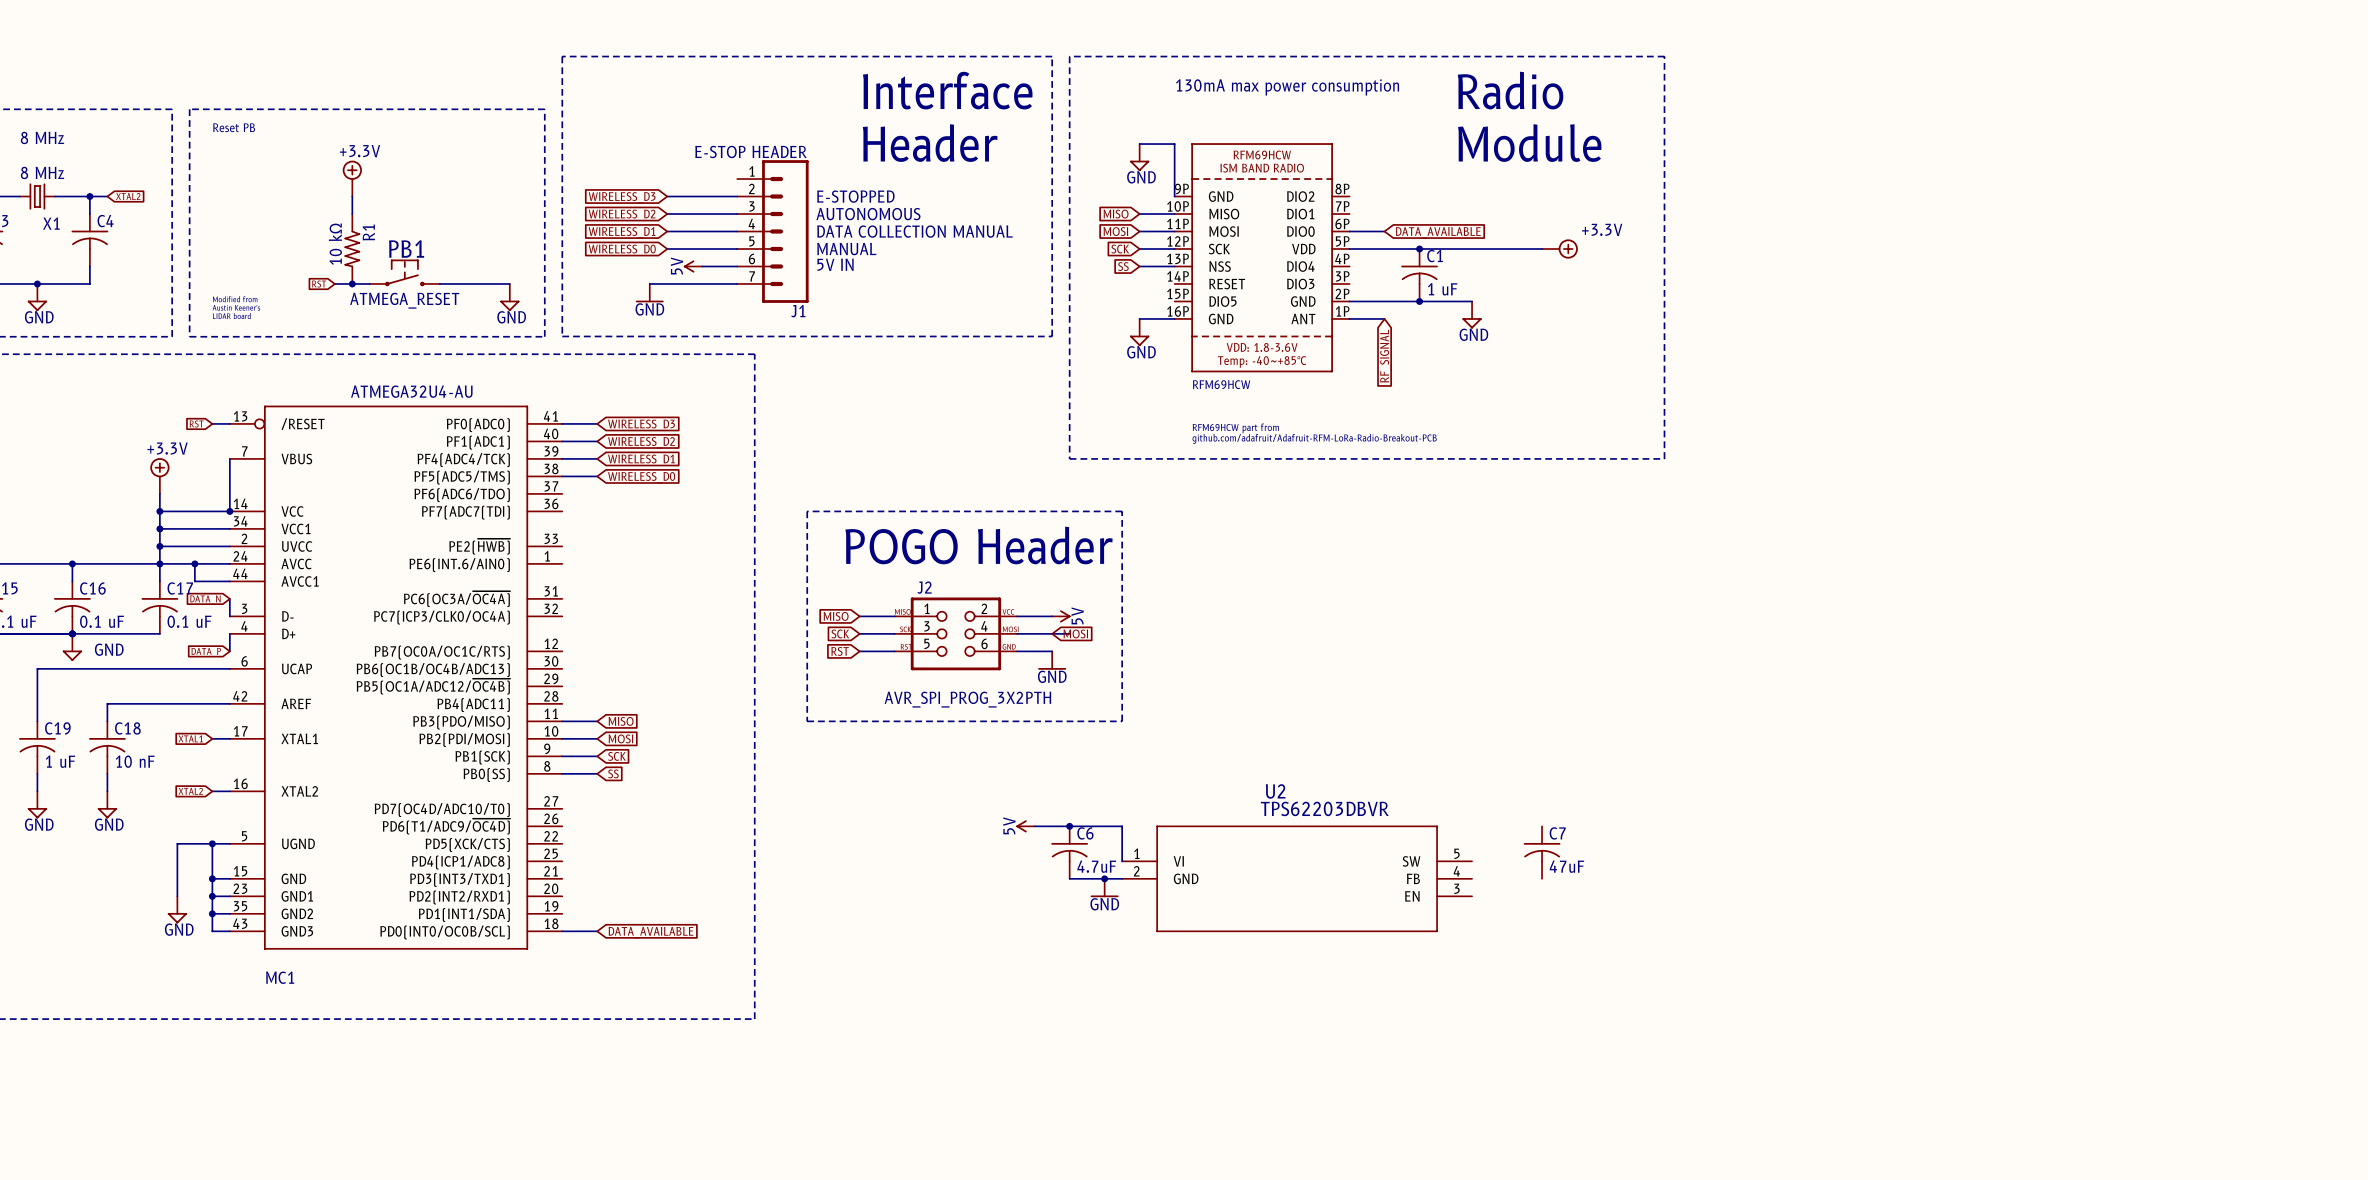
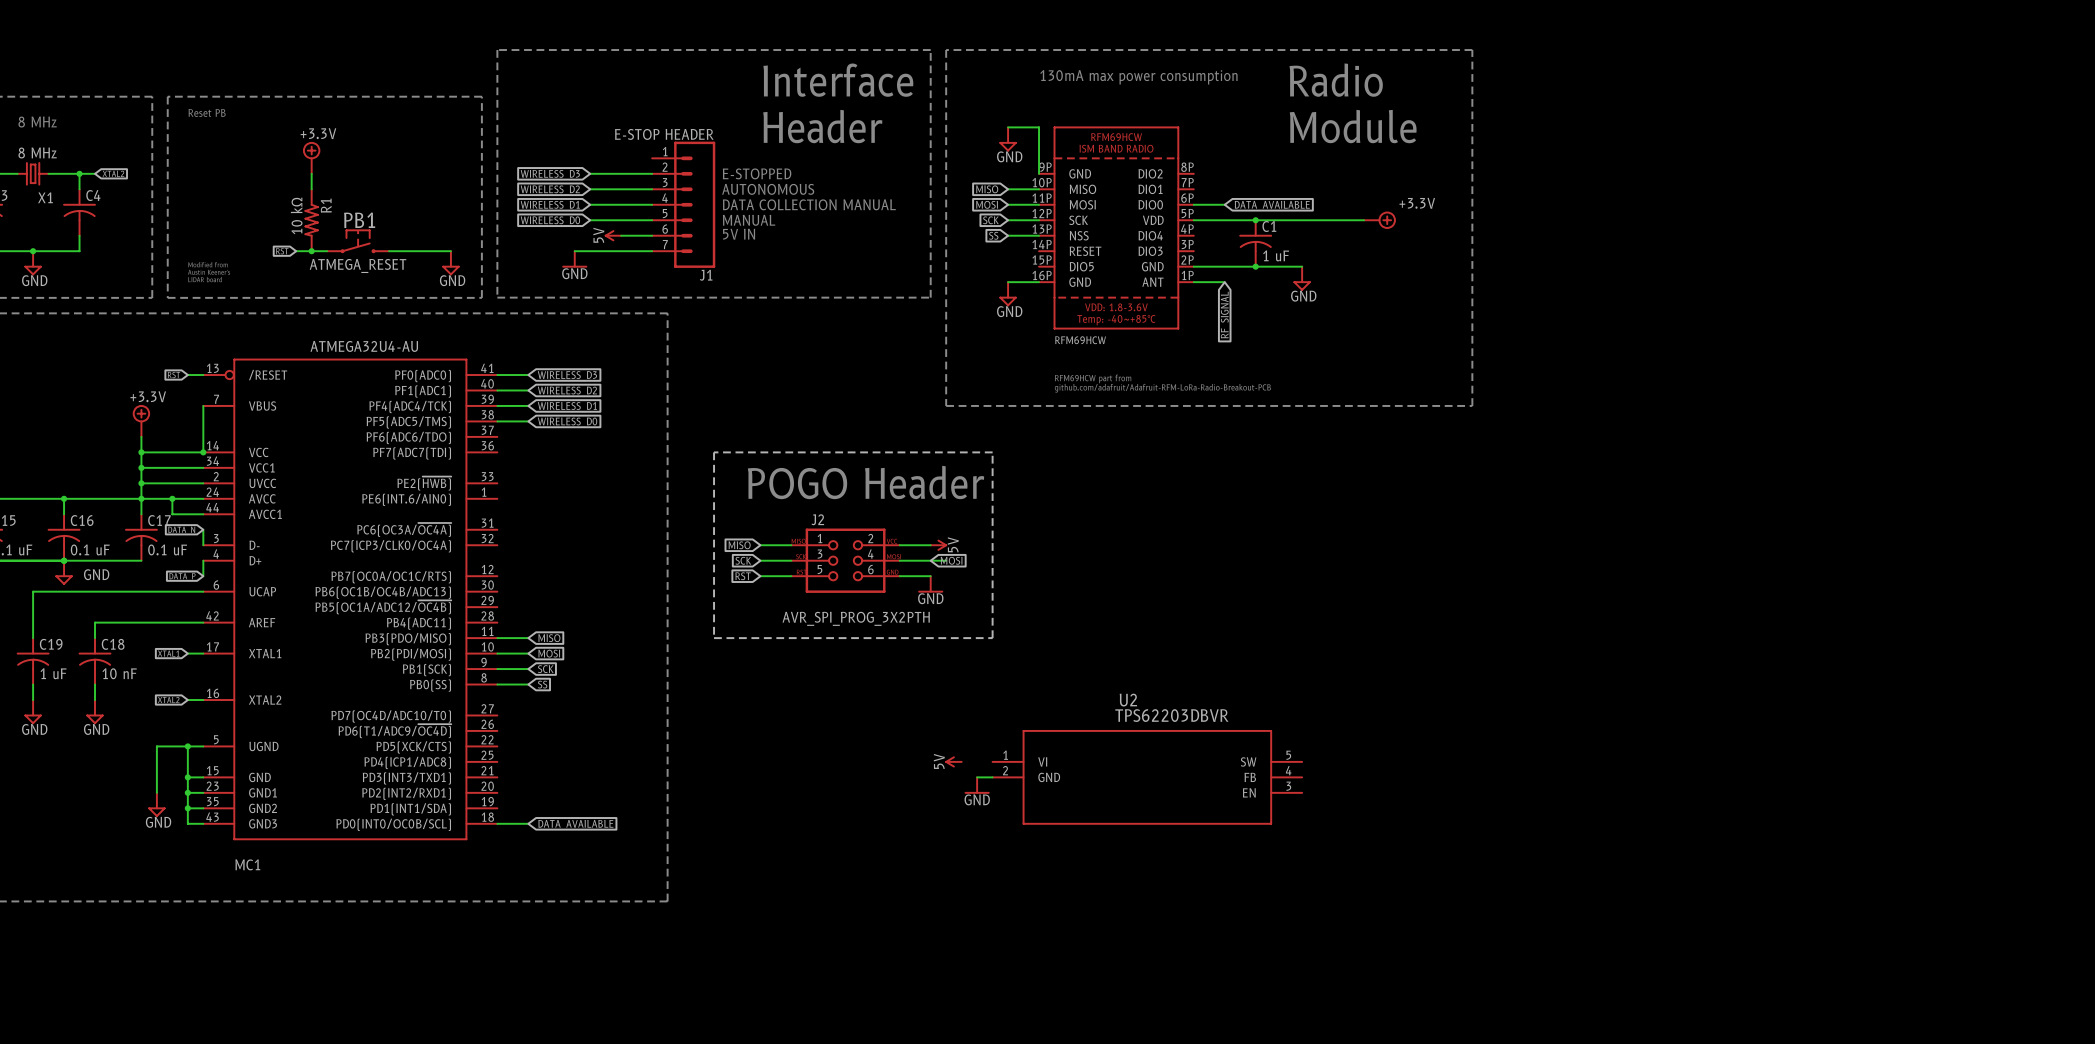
power symbol position: 5V (1025, 826) -> 5V (953, 761)
wire: (1034, 826) (1122, 826) (1122, 861) -> none
junction: (1069, 826) -> none
C6: 4.7uF (1069, 852) -> none
C7: 47uF (1542, 852) -> none
wire: (1069, 878) (1104, 878) -> none
junction: (1104, 878) -> none

